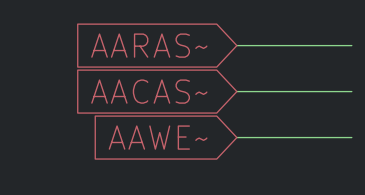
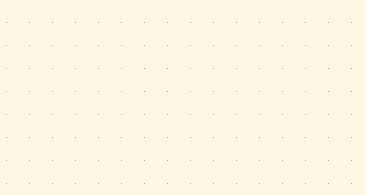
global label: AARAS~ (149, 45) -> none
wire: (236, 45) (351, 45) -> none
global label: AACAS~ (149, 91) -> none
wire: (236, 91) (351, 91) -> none
global label: AAWE~ (158, 137) -> none
wire: (236, 137) (351, 137) -> none

